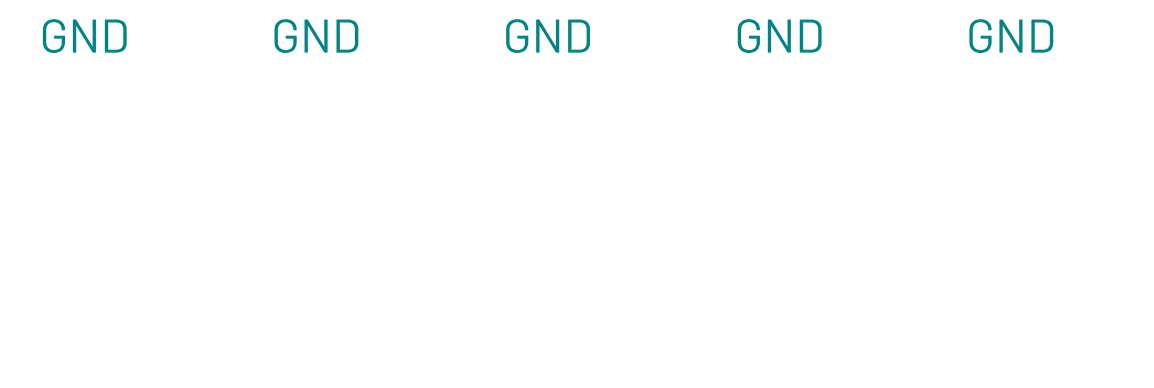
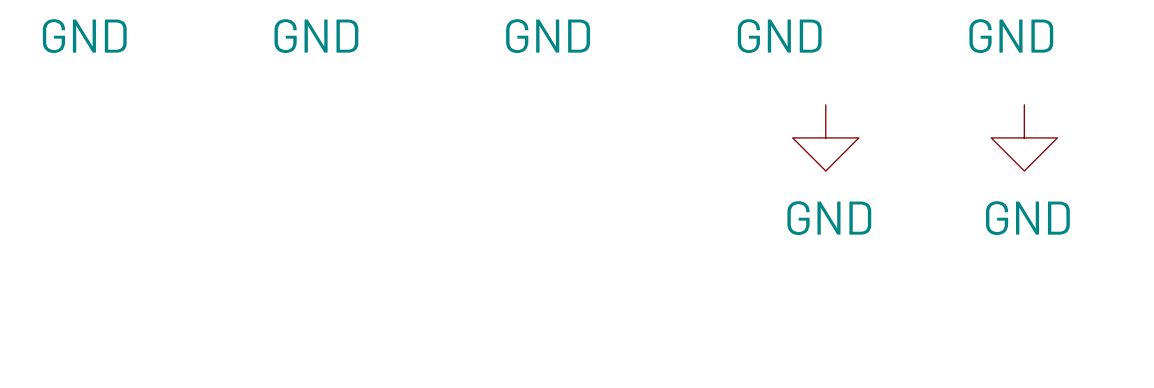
power symbol: none -> GND (825, 137)
power symbol: none -> GND (1024, 137)

